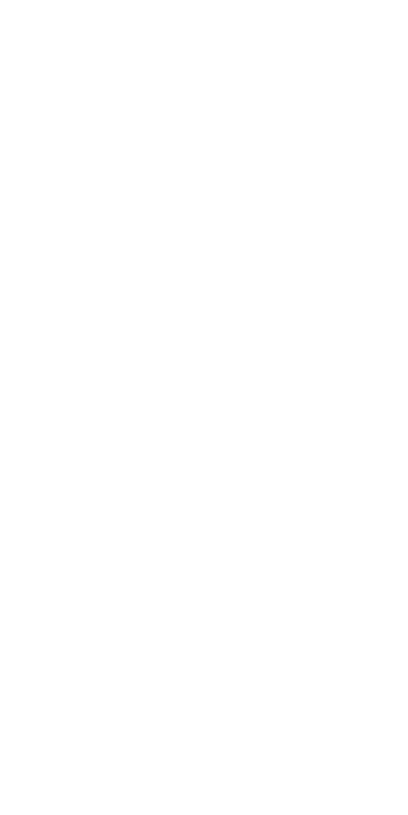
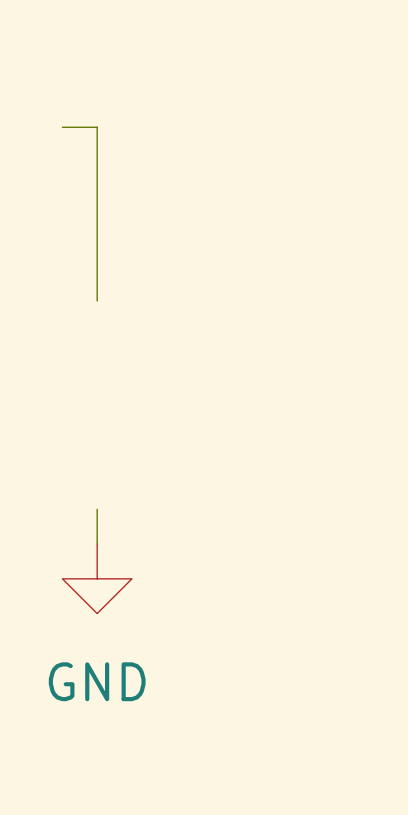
wire: none -> (62, 127) (97, 127) (97, 300)
wire: none -> (97, 509) (97, 544)
power symbol: none -> GND (97, 578)

